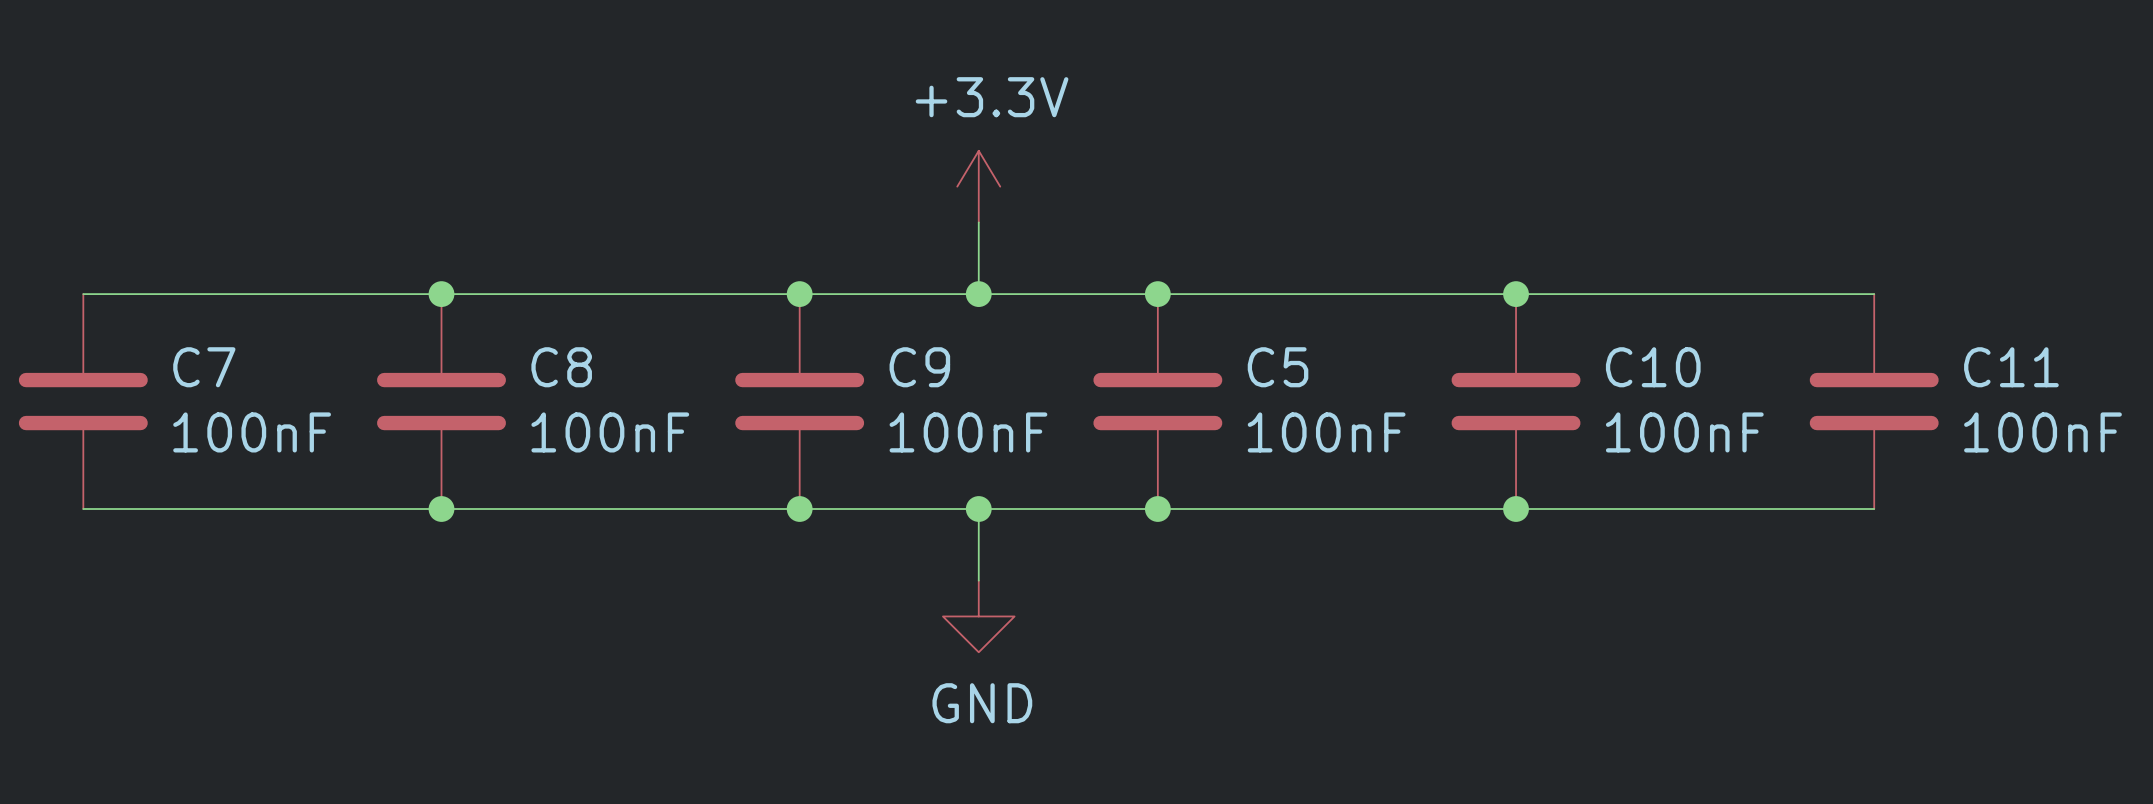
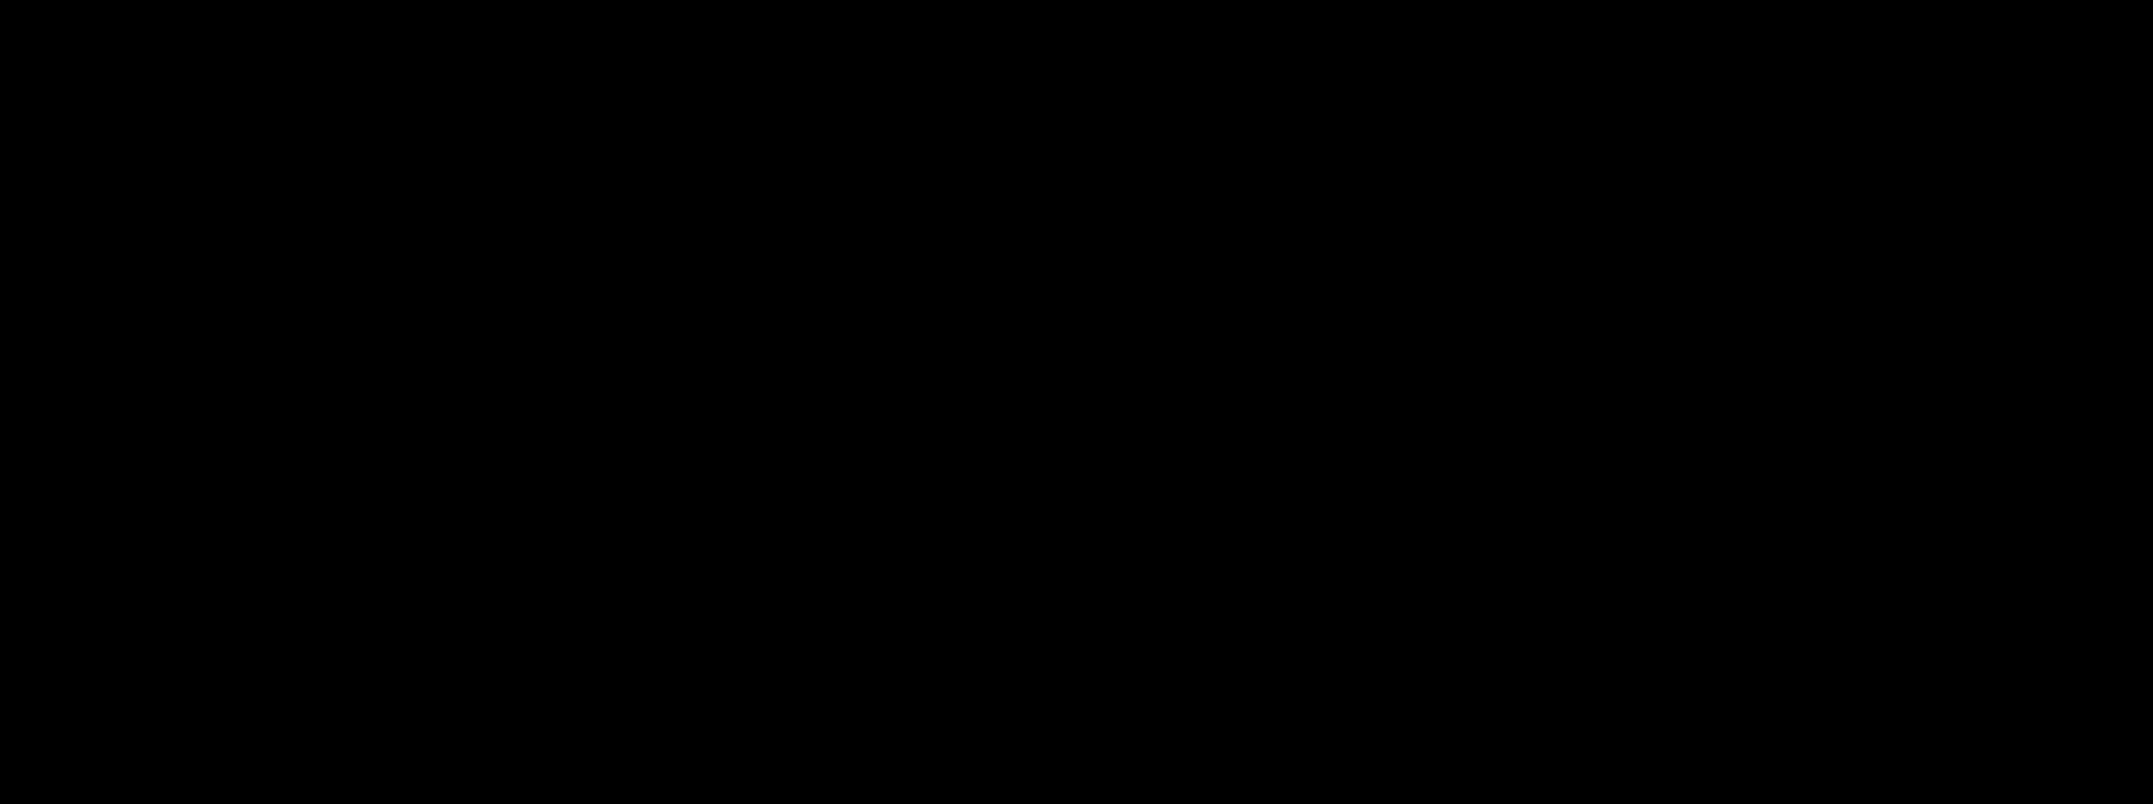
power symbol: +3.3V (978, 186) -> none
wire: (978, 222) (978, 294) -> none
wire: (83, 294) (1874, 294) -> none
junction: (441, 294) -> none
junction: (799, 294) -> none
junction: (978, 294) -> none
junction: (1157, 294) -> none
junction: (1516, 294) -> none
C7: 100nF (83, 401) -> none
C8: 100nF (441, 401) -> none
C9: 100nF (799, 401) -> none
C5: 100nF (1157, 401) -> none
C10: 100nF (1516, 401) -> none
C11: 100nF (1874, 401) -> none
wire: (83, 509) (1874, 509) -> none
junction: (441, 509) -> none
junction: (799, 509) -> none
wire: (978, 509) (978, 580) -> none
junction: (978, 509) -> none
junction: (1157, 509) -> none
junction: (1516, 509) -> none
power symbol: GND (978, 616) -> none

